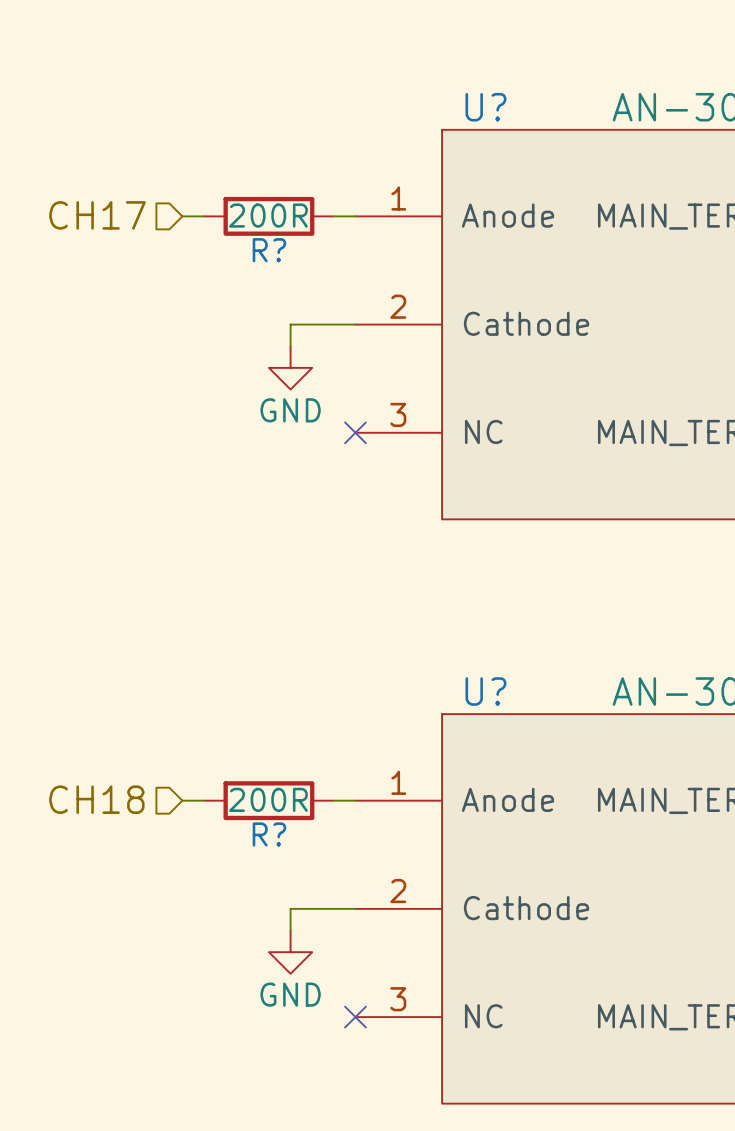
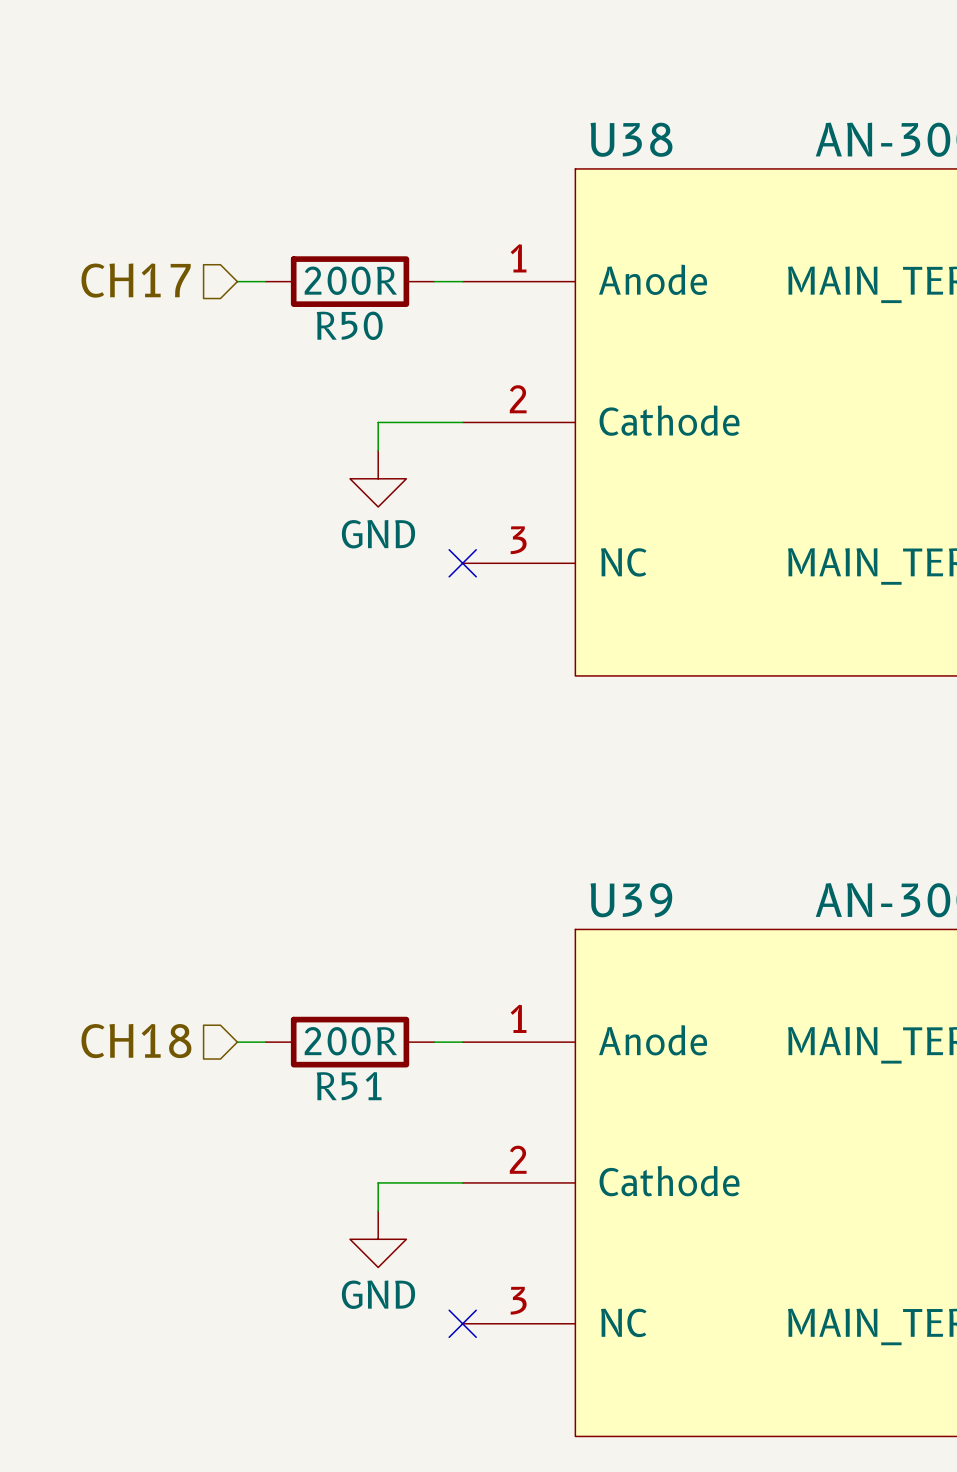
U? name: U? (485, 107) -> U38 (631, 139)
R? name: R? (269, 250) -> R50 (349, 325)
U? name: U? (485, 691) -> U39 (631, 900)
R? name: R? (269, 834) -> R51 (349, 1086)

